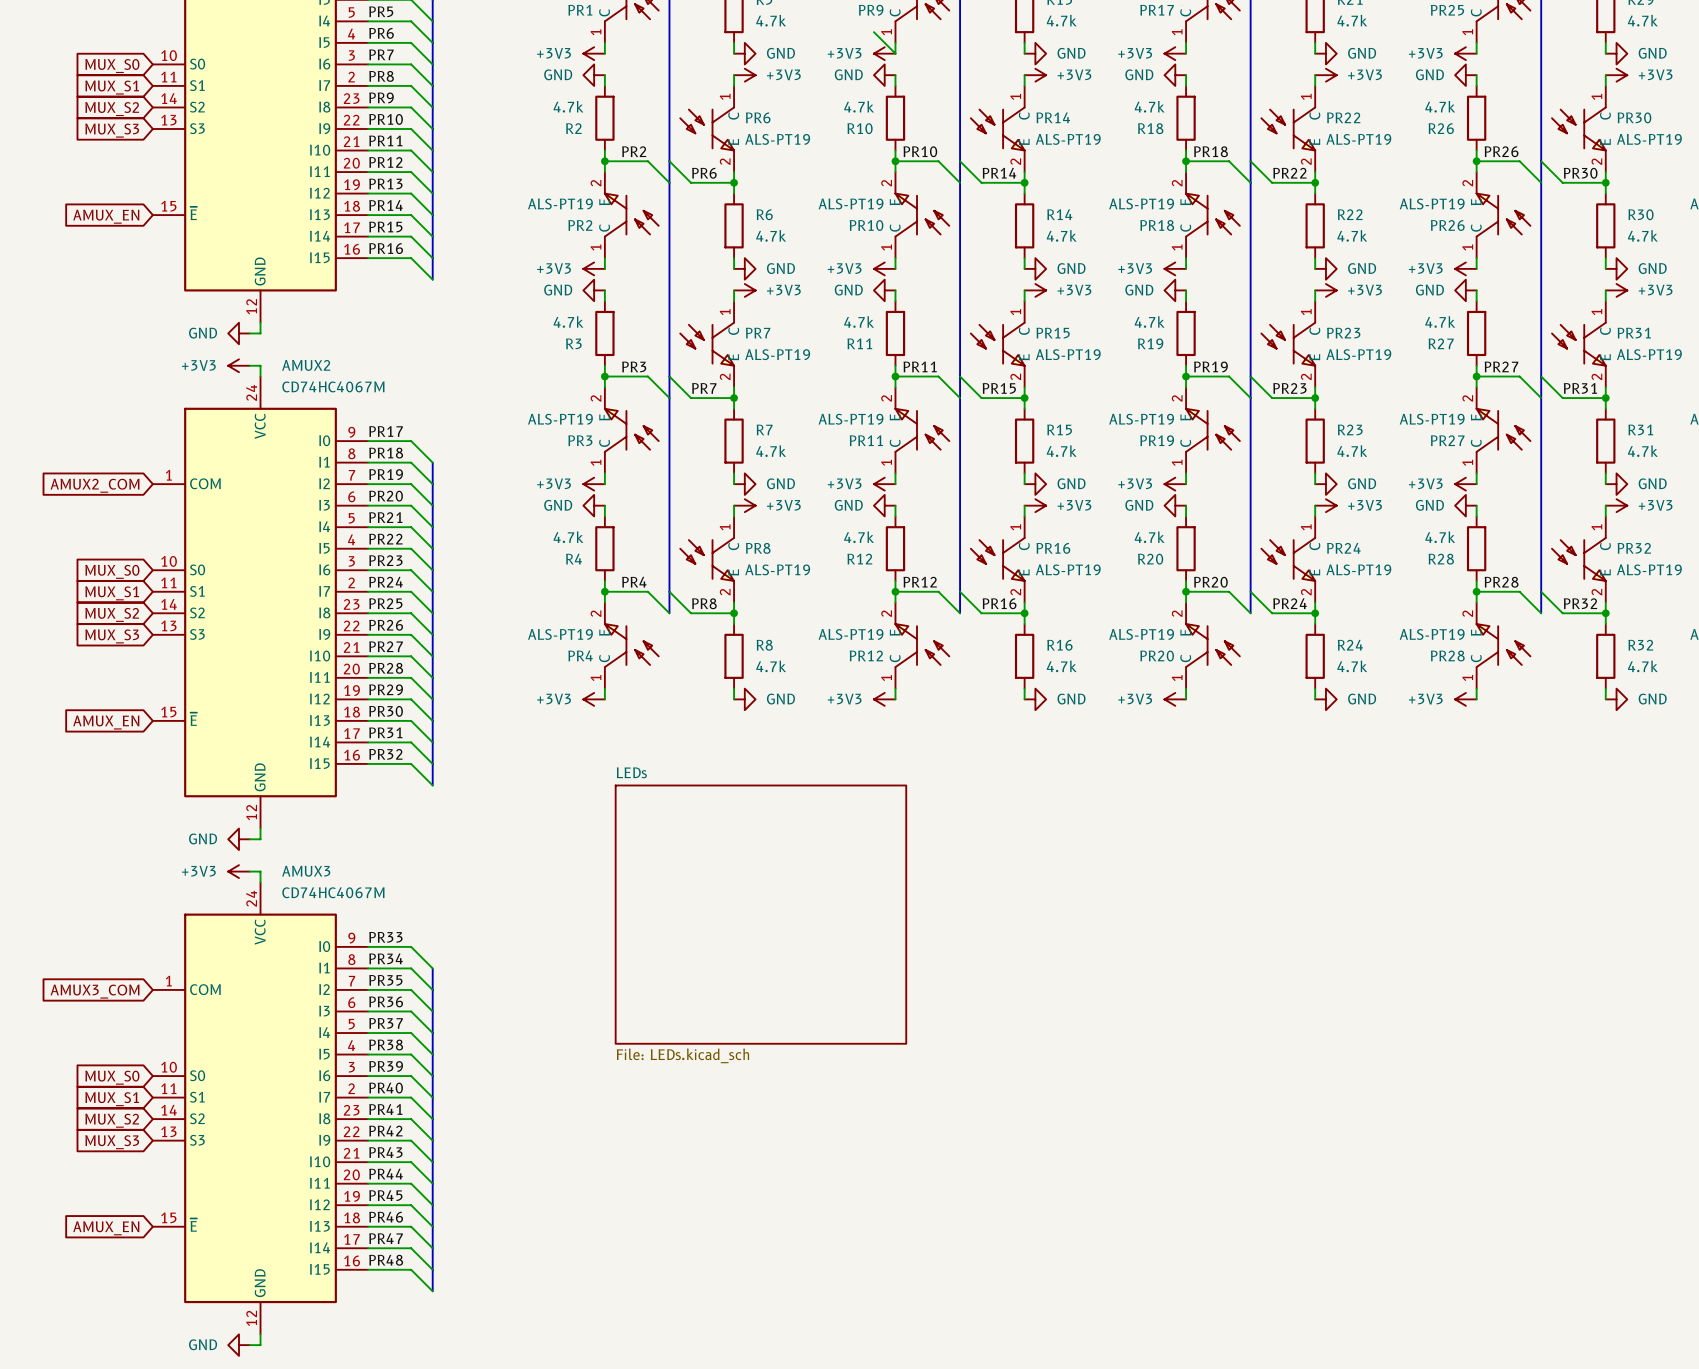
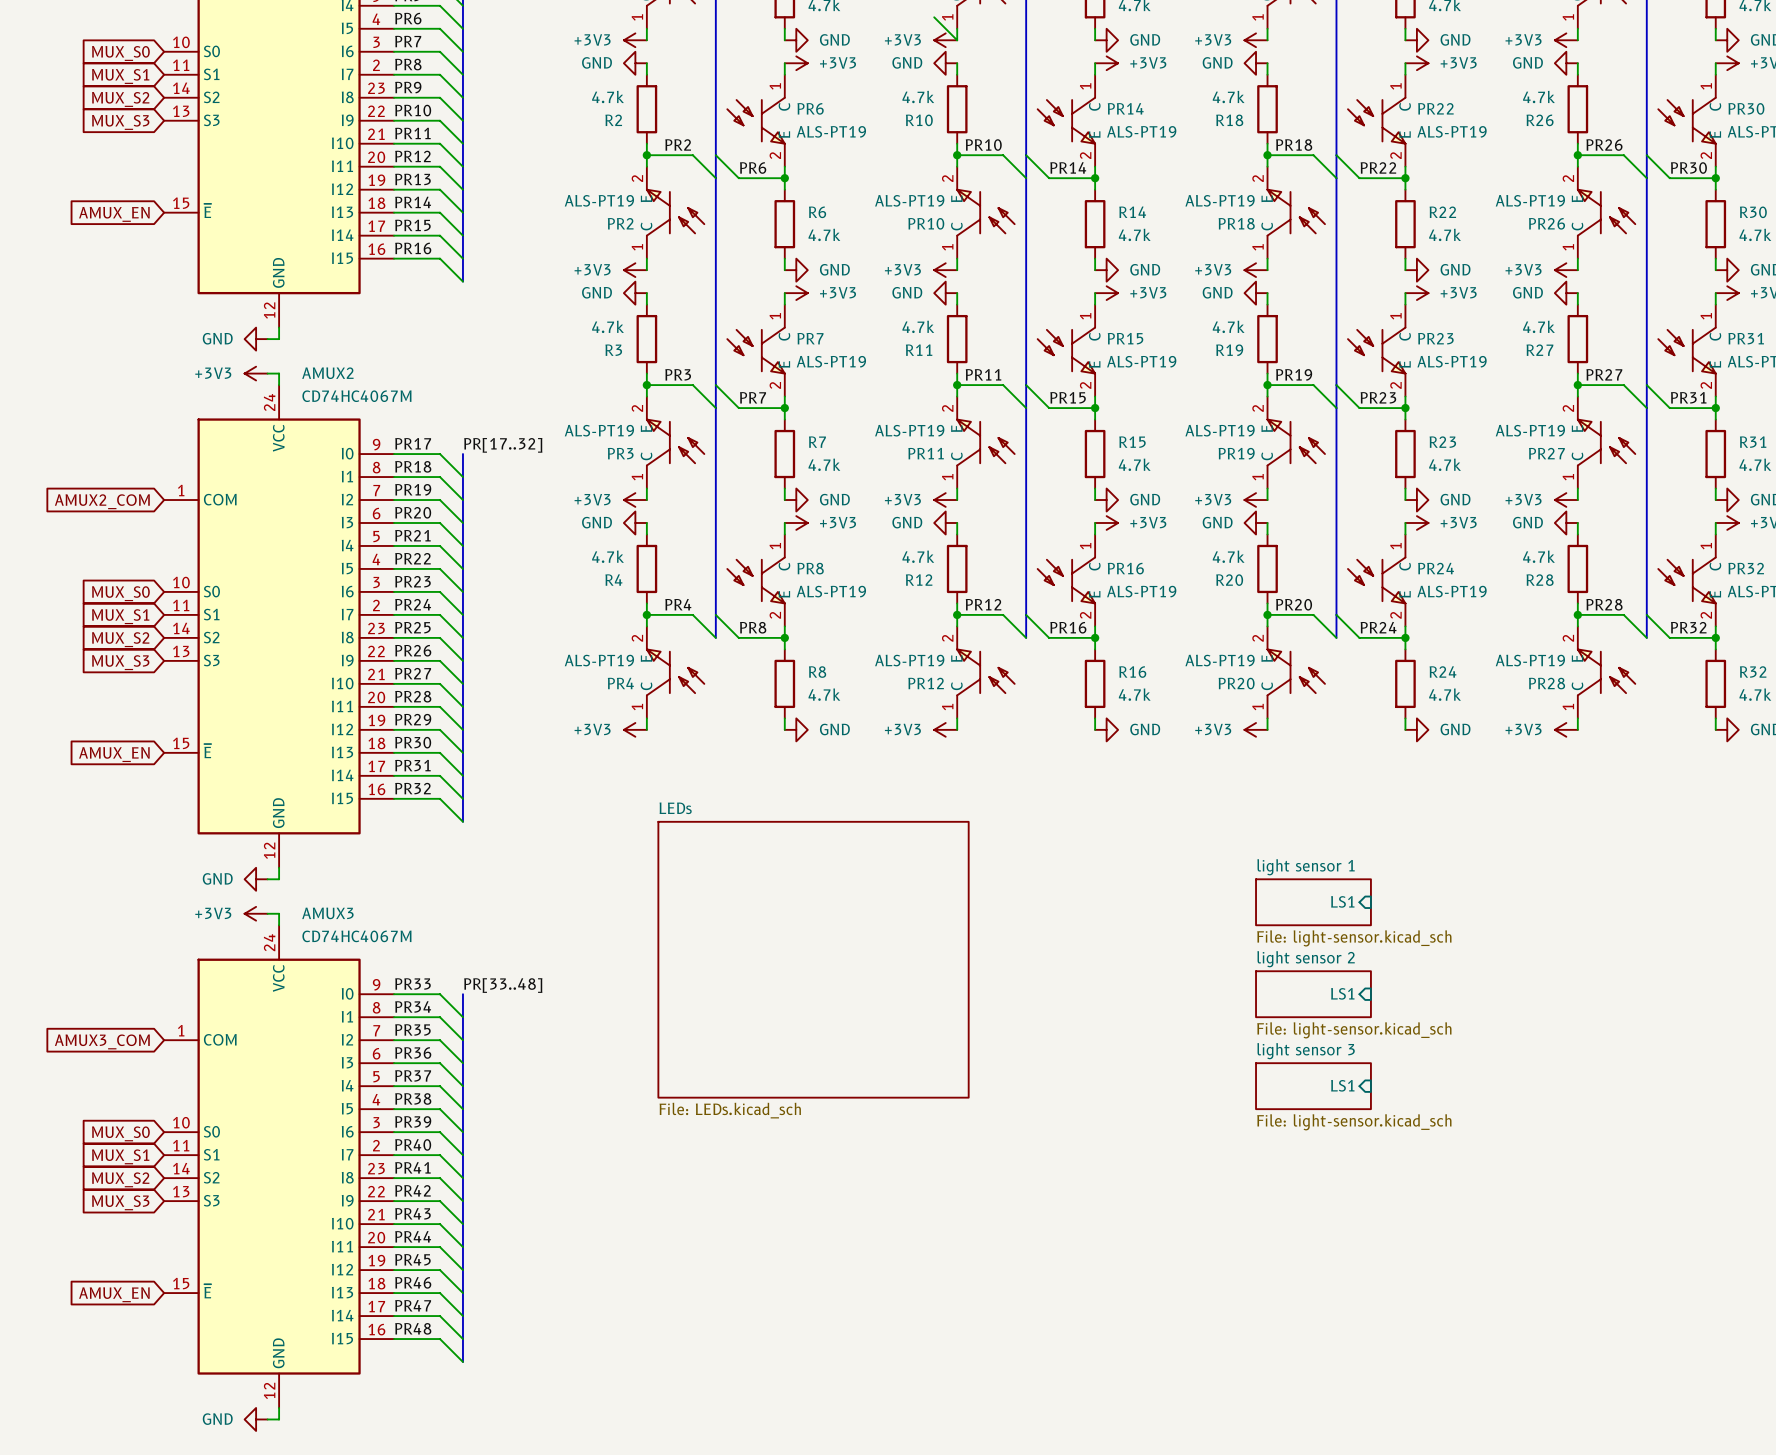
label: none -> PR[17..32] (503, 445)
bus: none -> (462, 454) (462, 477)
sheet light sensor 1: none -> File: light-sensor.kicad_sch (1313, 902)
sheet pin: none -> LS1 (1342, 901)
label: none -> PR[33..48] (503, 985)
bus: none -> (462, 994) (462, 1017)
sheet light sensor 2: none -> File: light-sensor.kicad_sch (1313, 994)
sheet pin: none -> LS1 (1342, 993)
sheet pin: none -> LS1 (1342, 1085)
sheet light sensor 3: none -> File: light-sensor.kicad_sch (1313, 1086)

